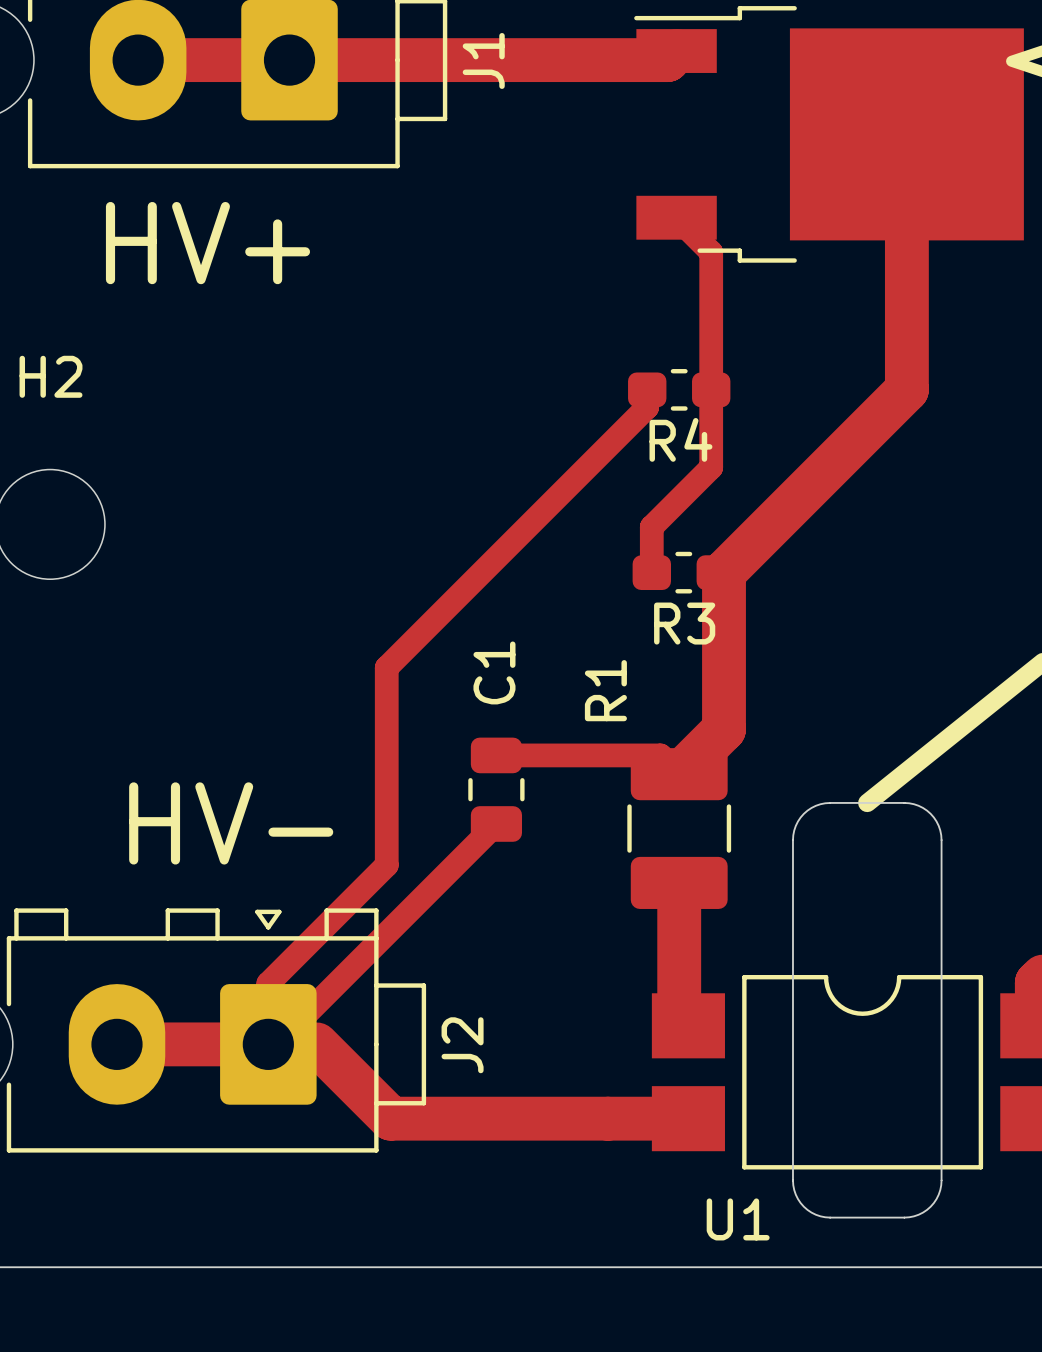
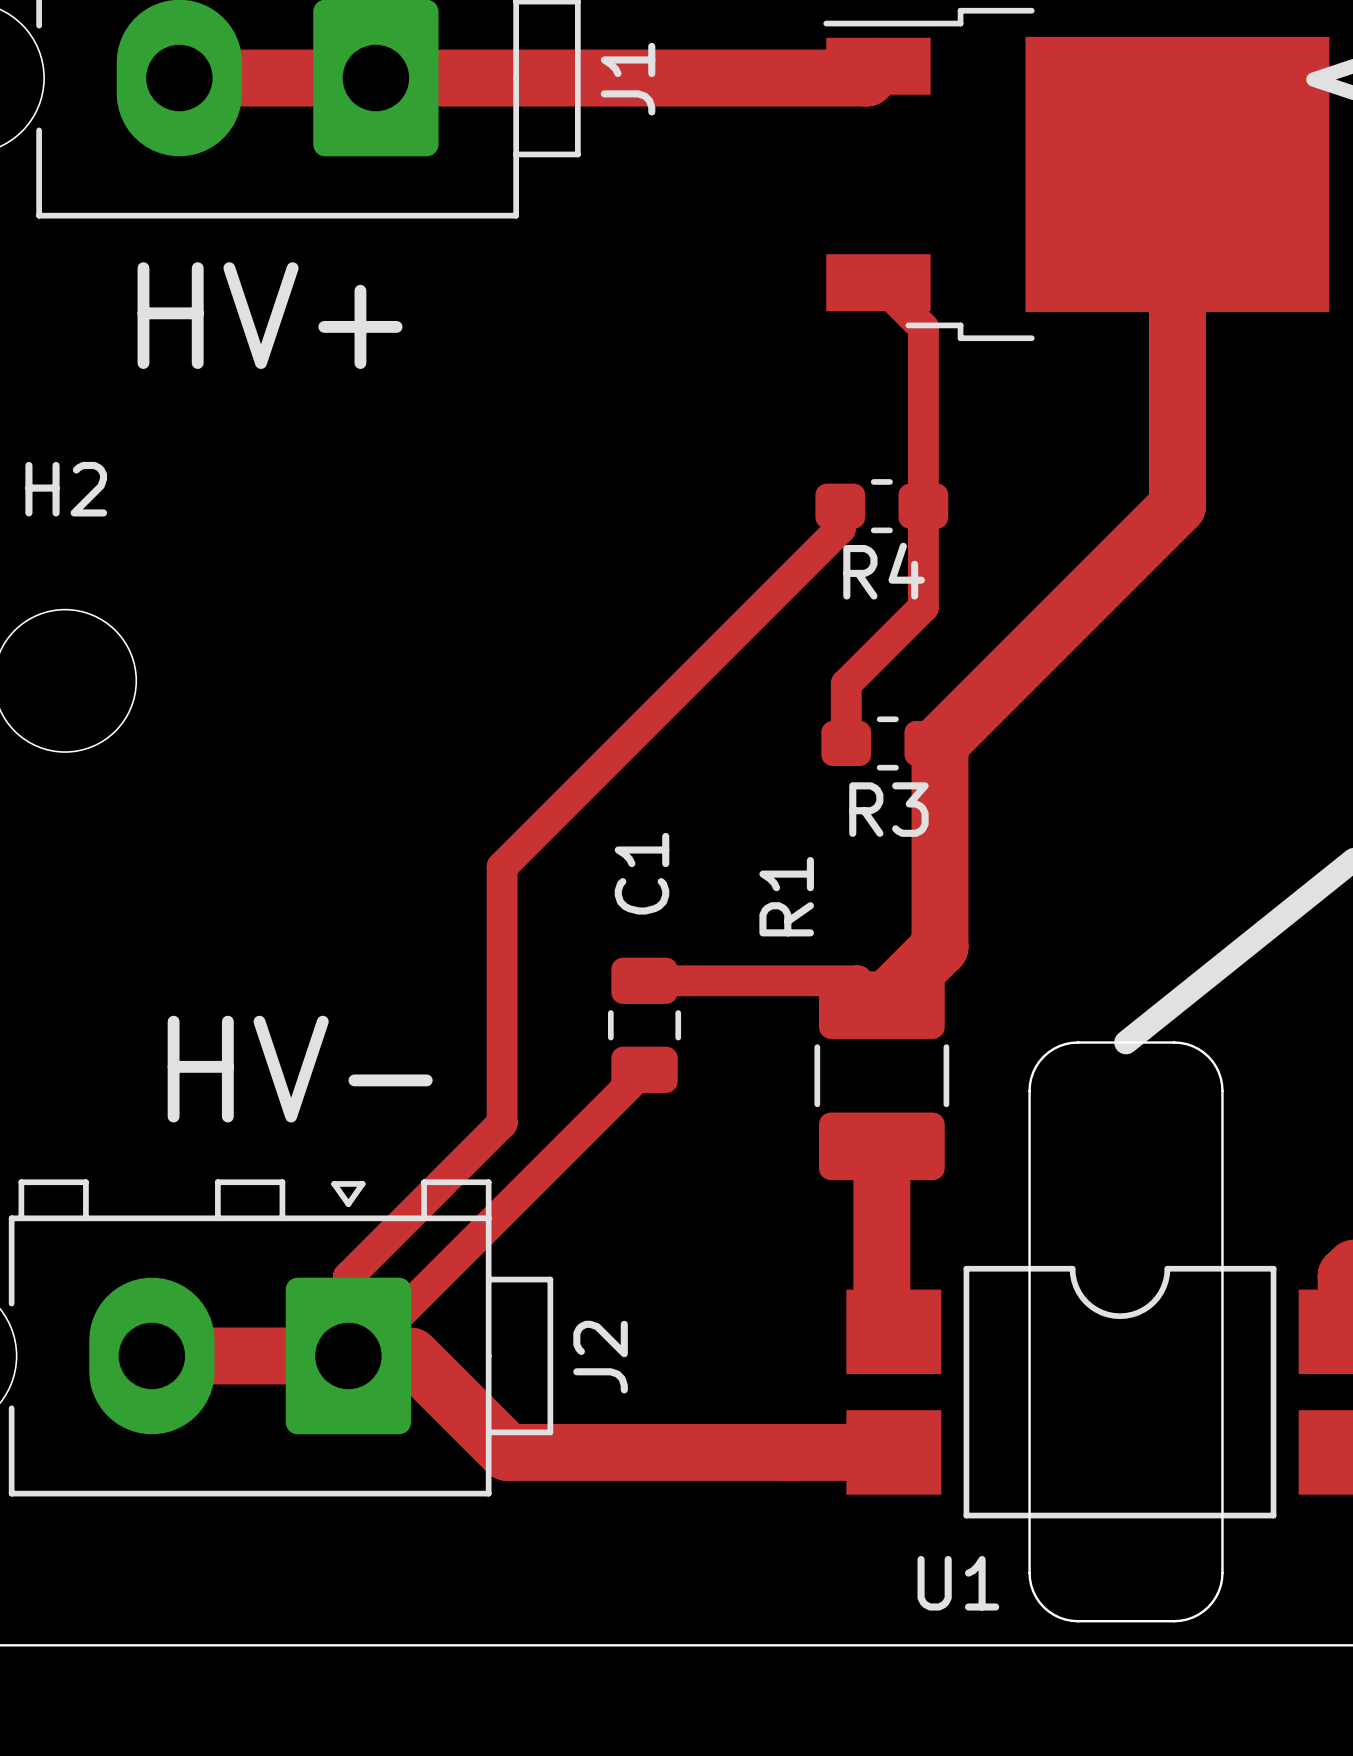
board edge: (792, 1180) (795, 1194) (803, 1206) (815, 1214) (830, 1217) (914, 1216) (927, 1209) (933, 1203) (940, 1190) (941, 1180) -> (1029, 1532) (1031, 1585) (1039, 1602) (1053, 1614) (1065, 1619) (1077, 1621) (1174, 1621) (1186, 1619) (1198, 1614) (1208, 1607) (1216, 1597) (1222, 1579) (1222, 1532)

